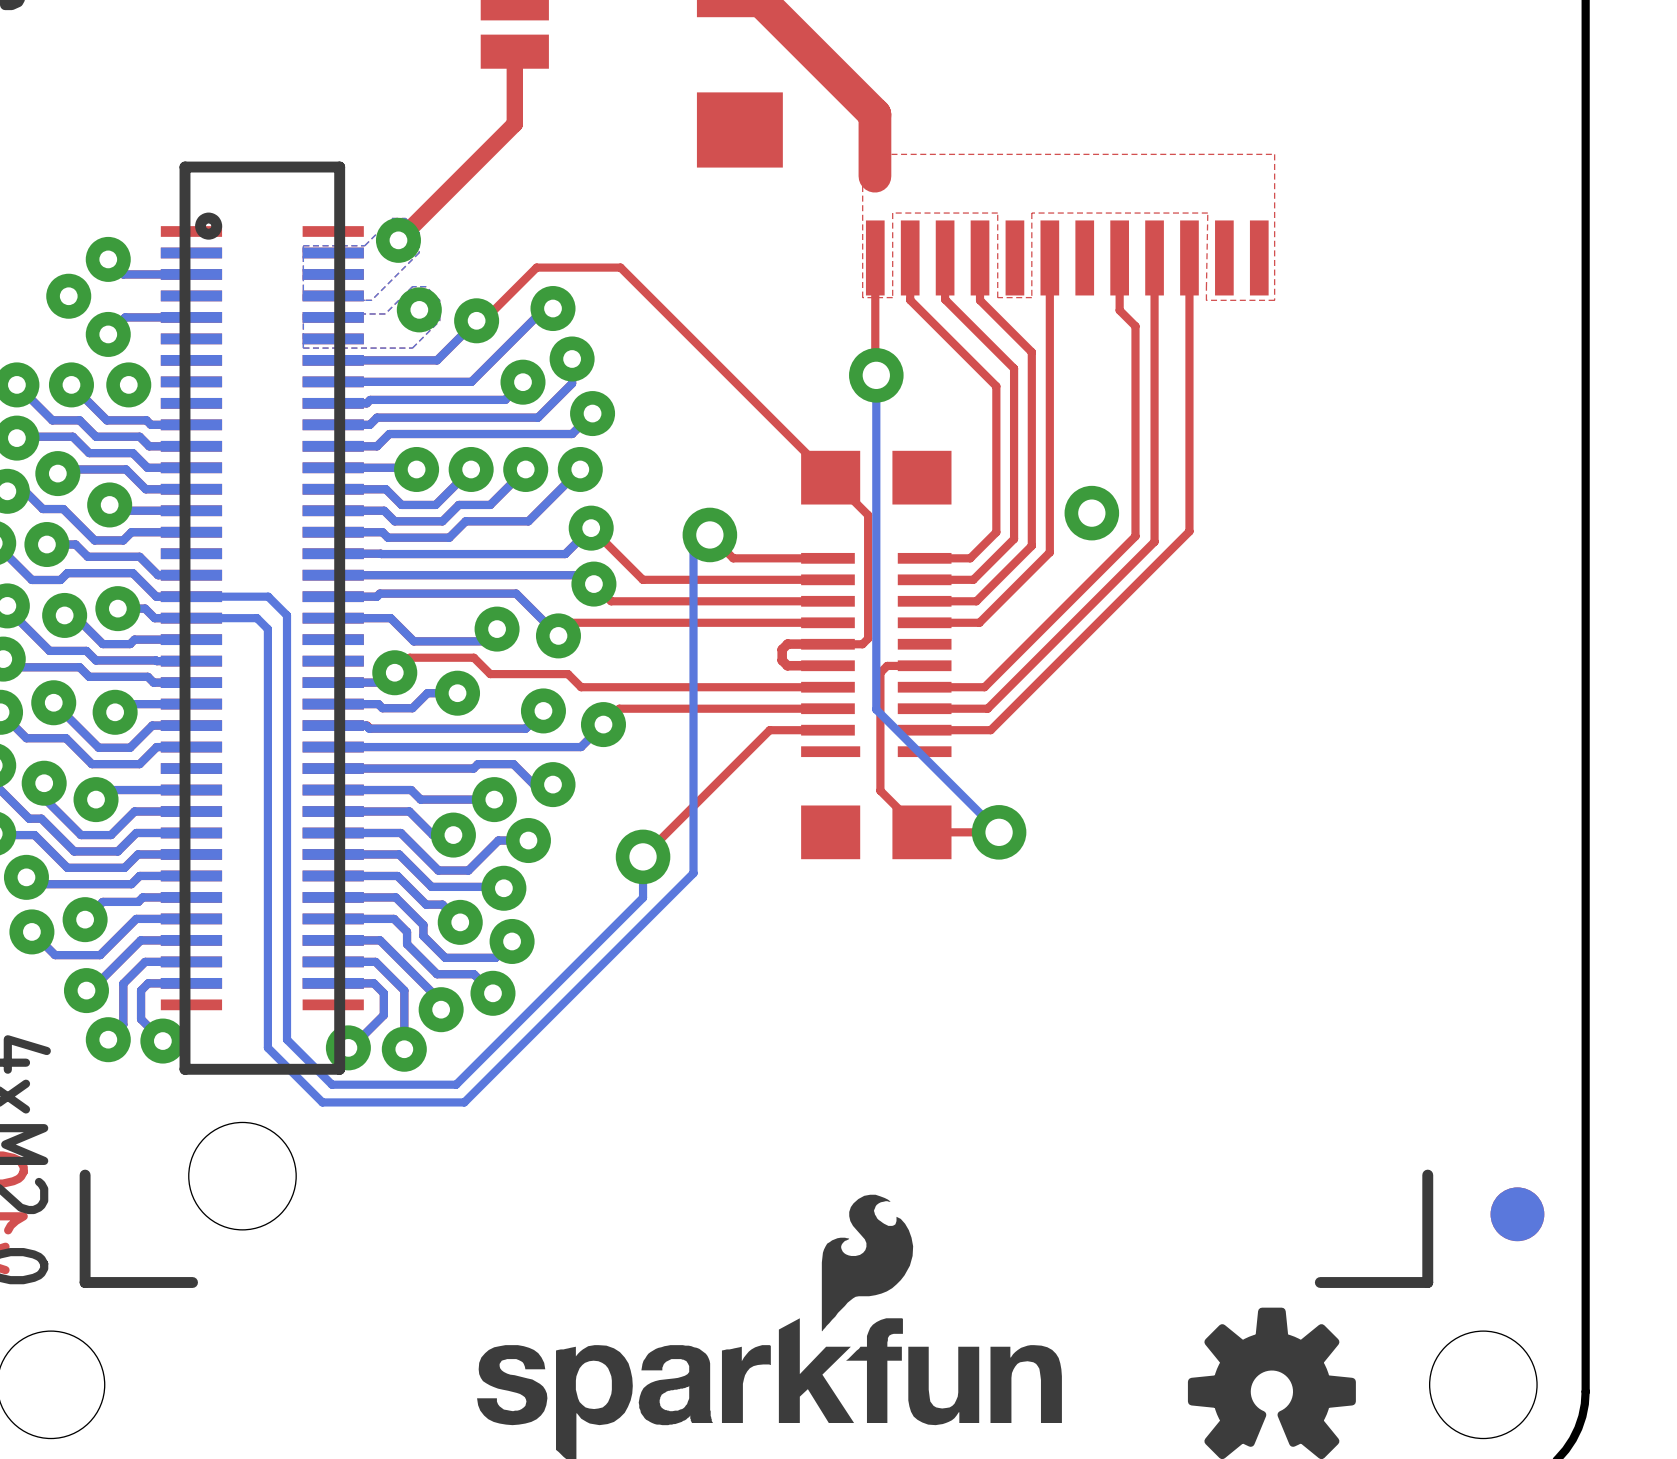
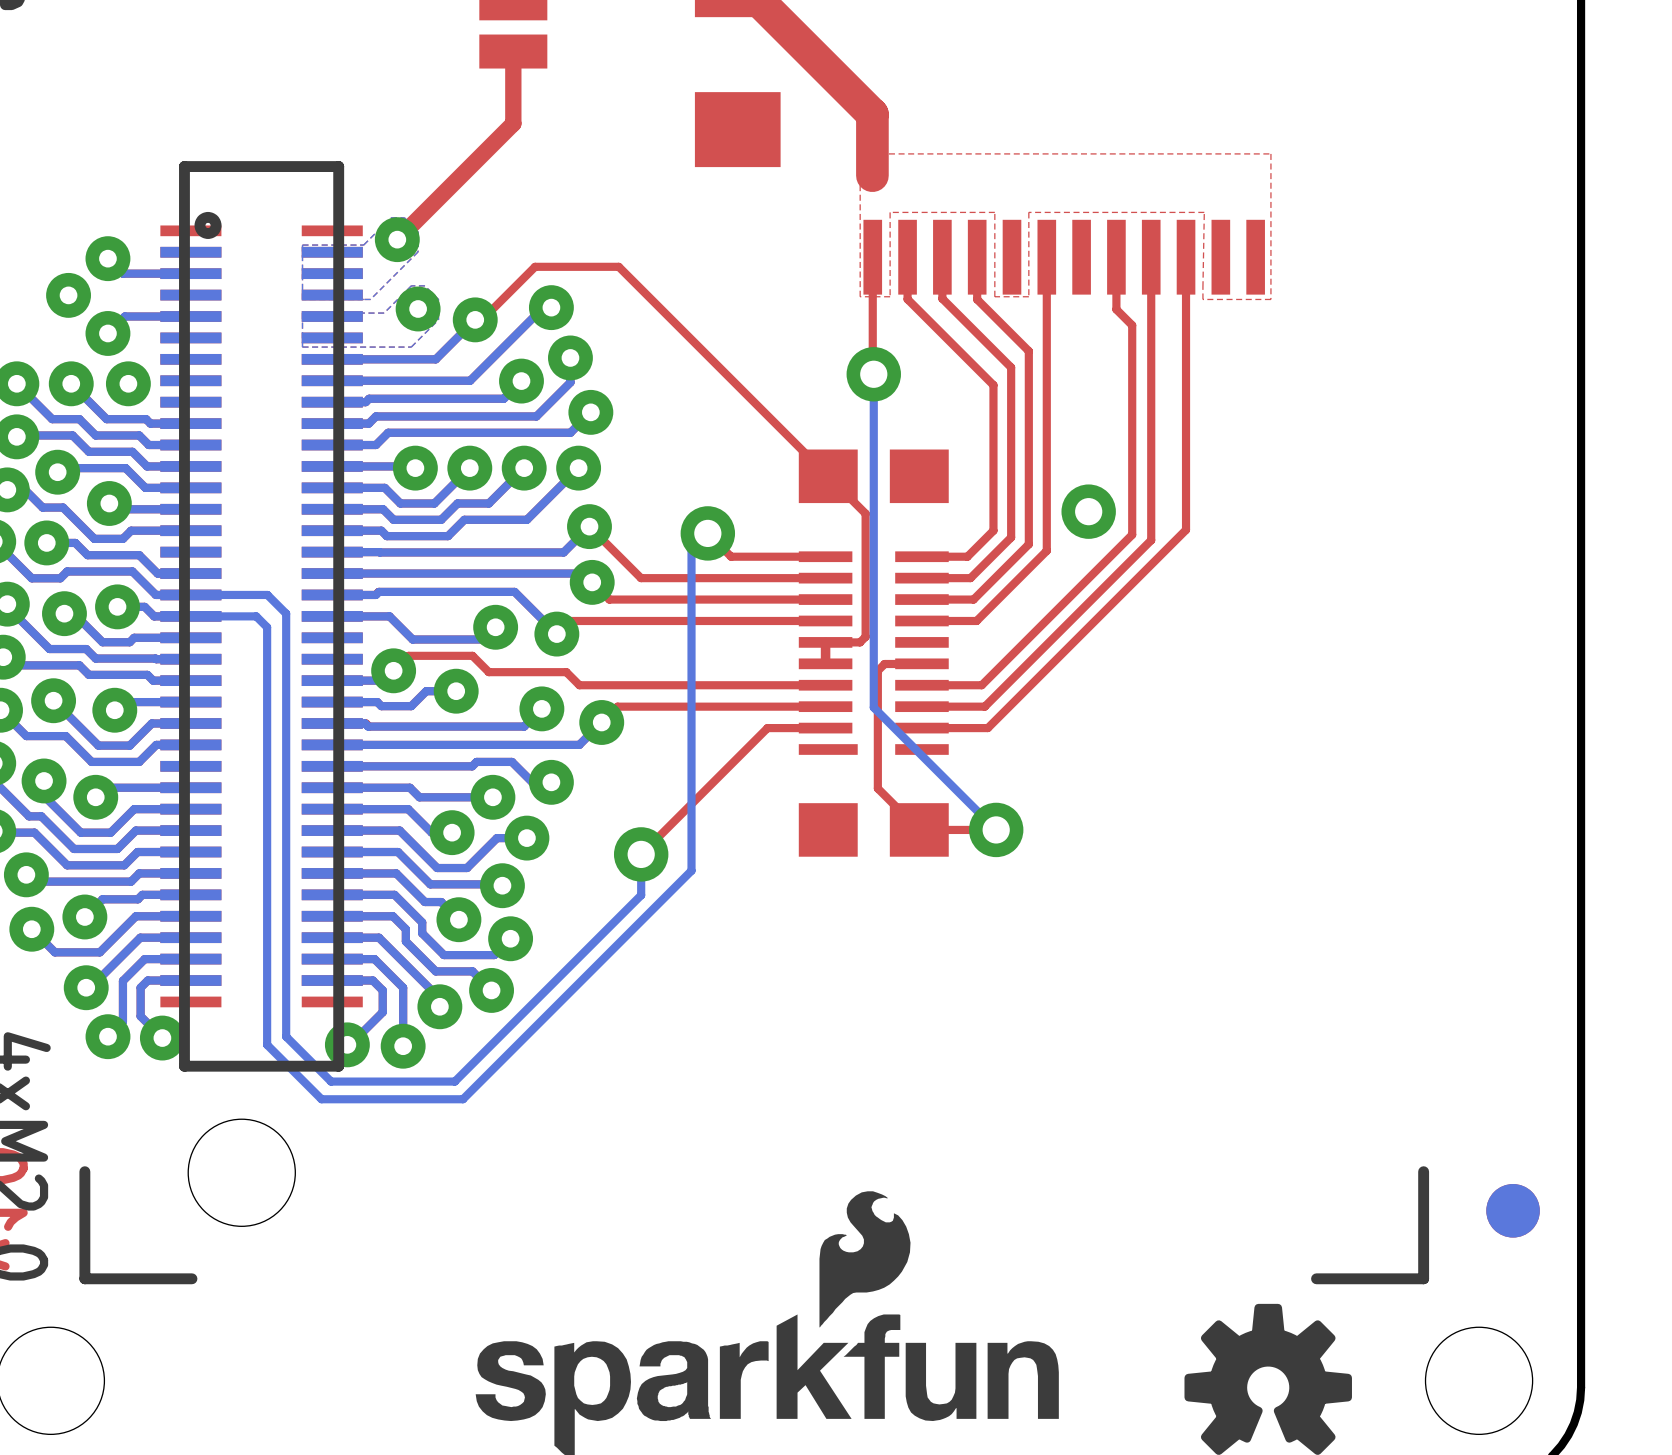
top track: (827, 644) (787, 644) (782, 649) (782, 660) (787, 665) (827, 665) -> (825, 642) (825, 663)

